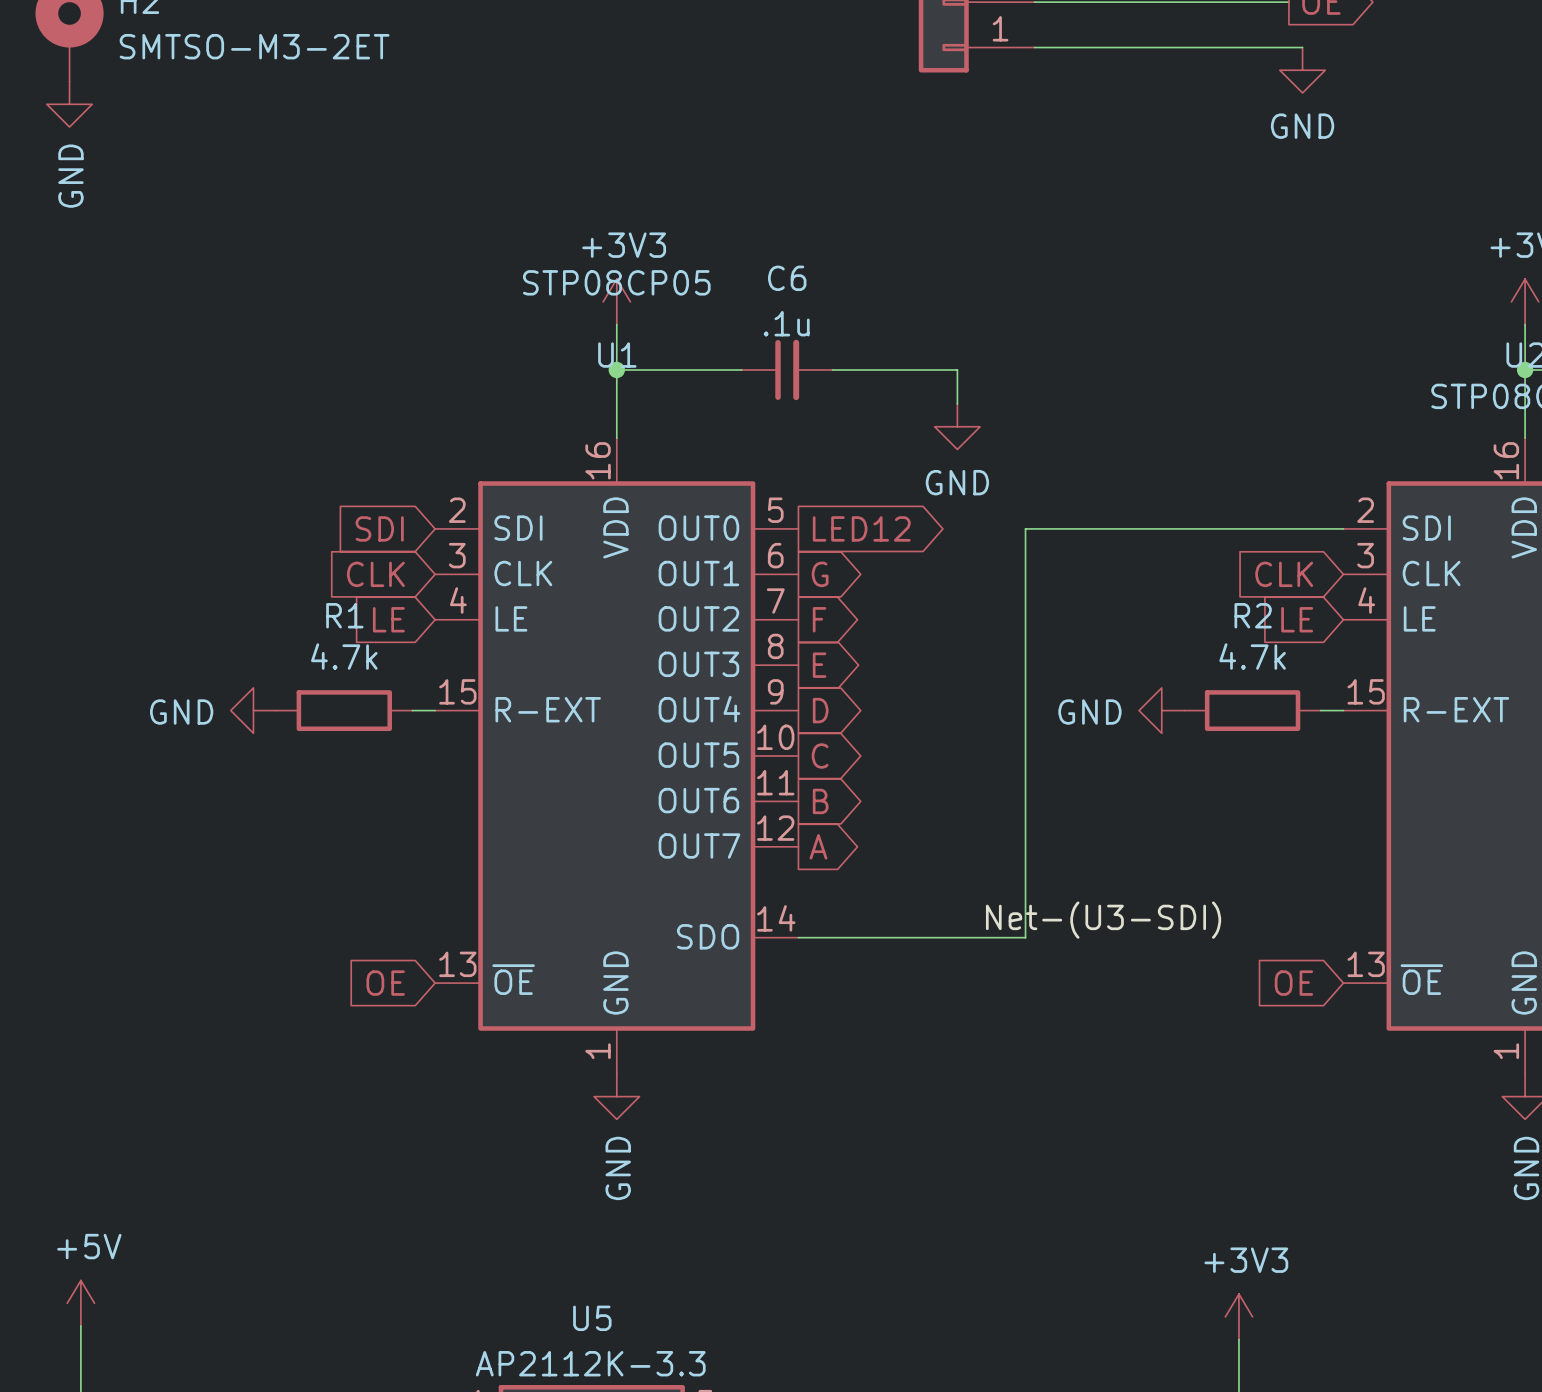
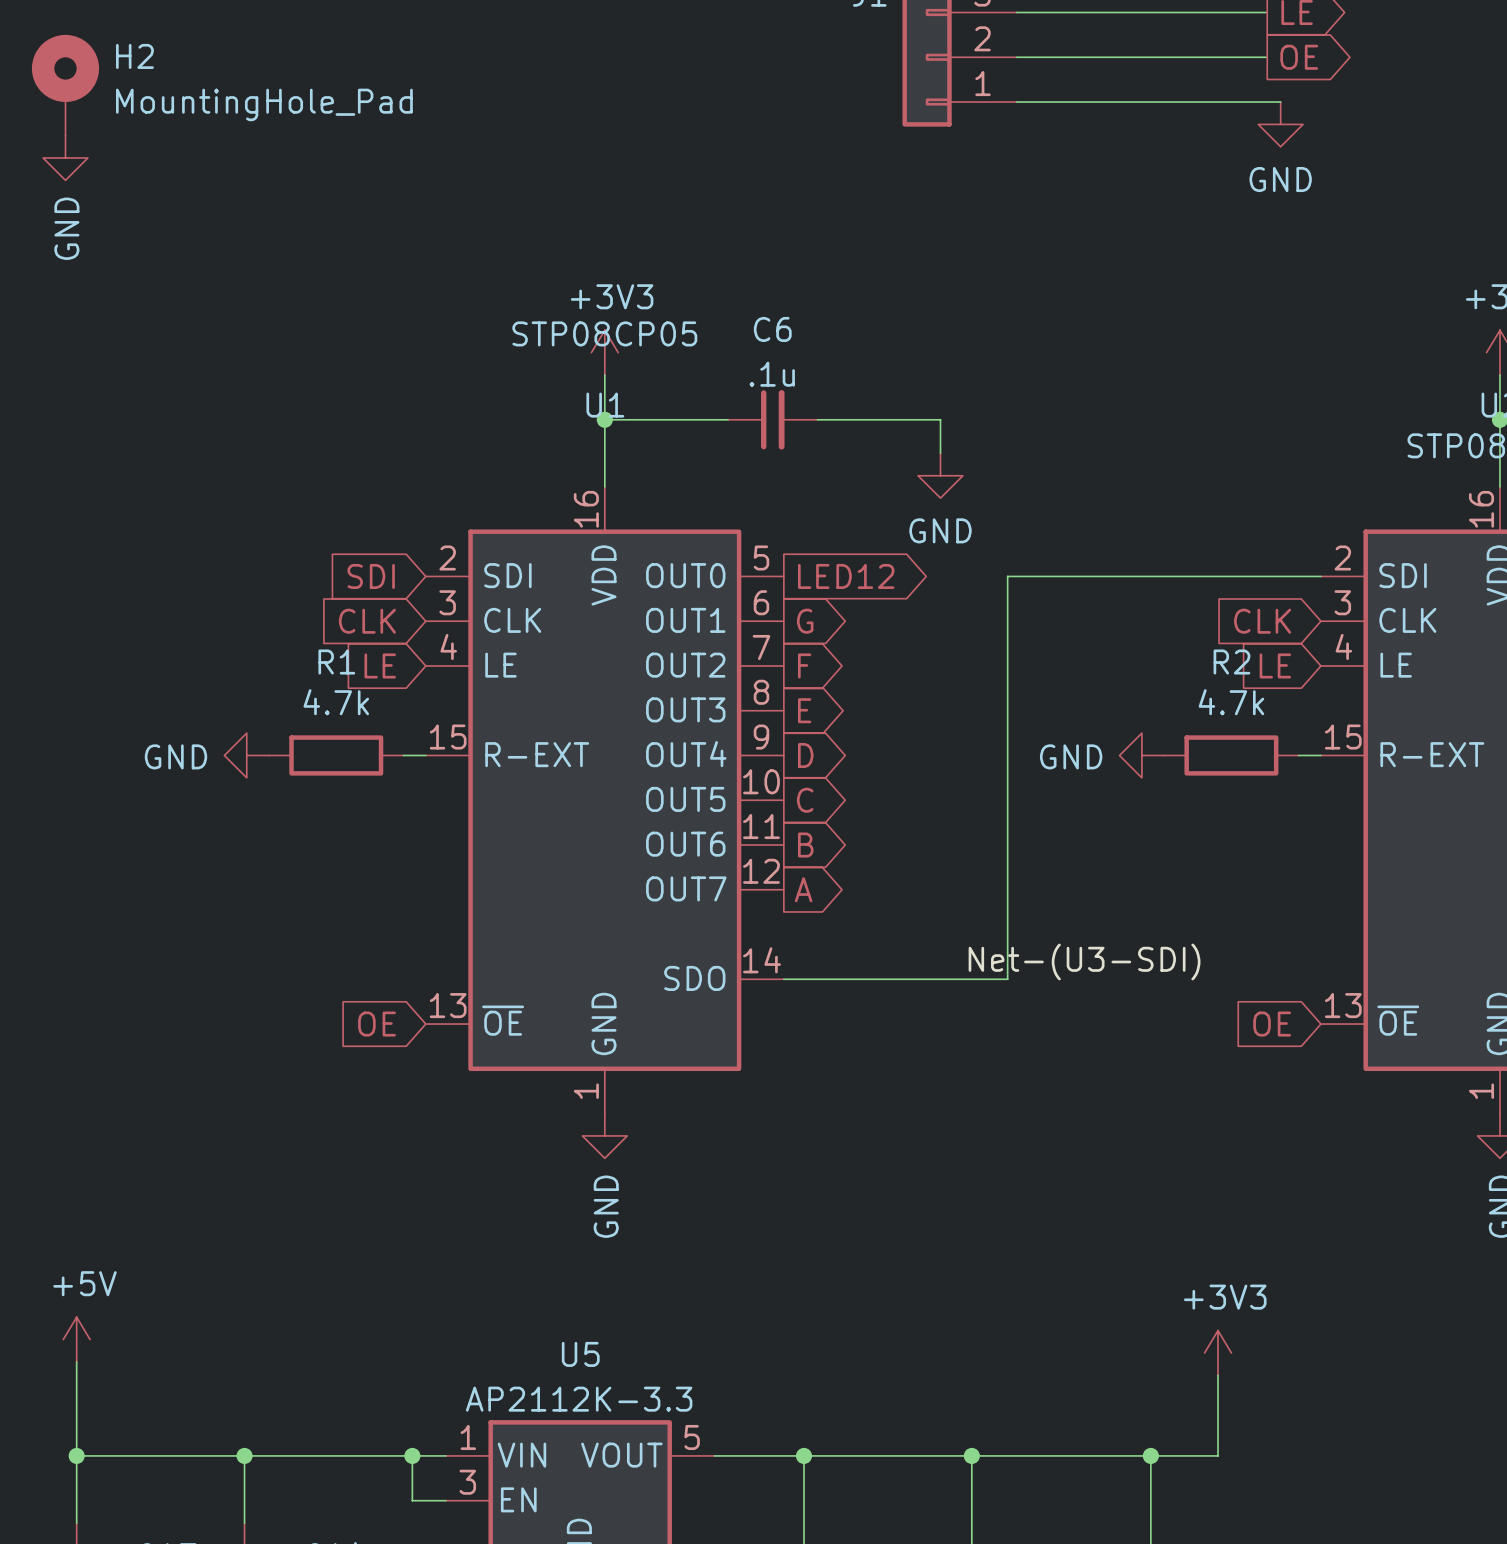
H2 value: SMTSO-M3-2ET (254, 46) -> MountingHole_Pad (264, 104)

